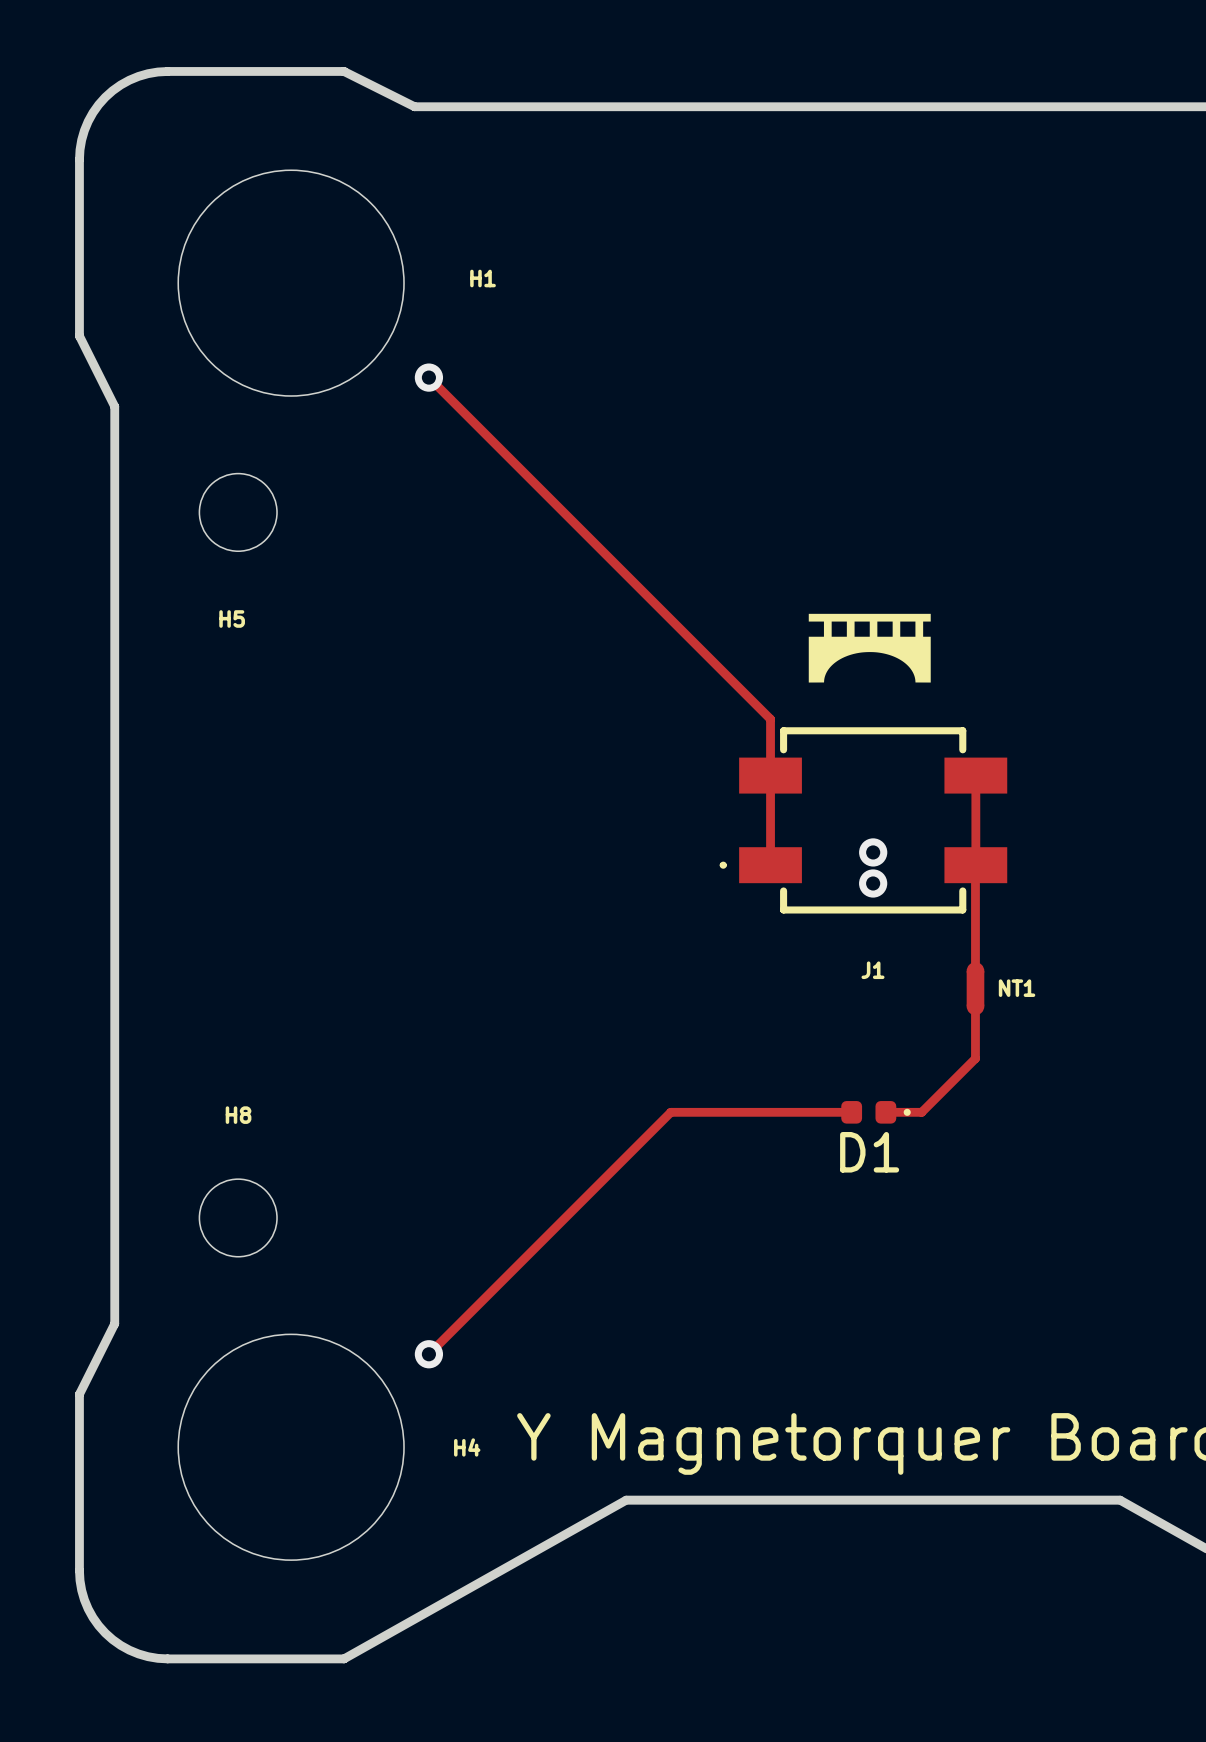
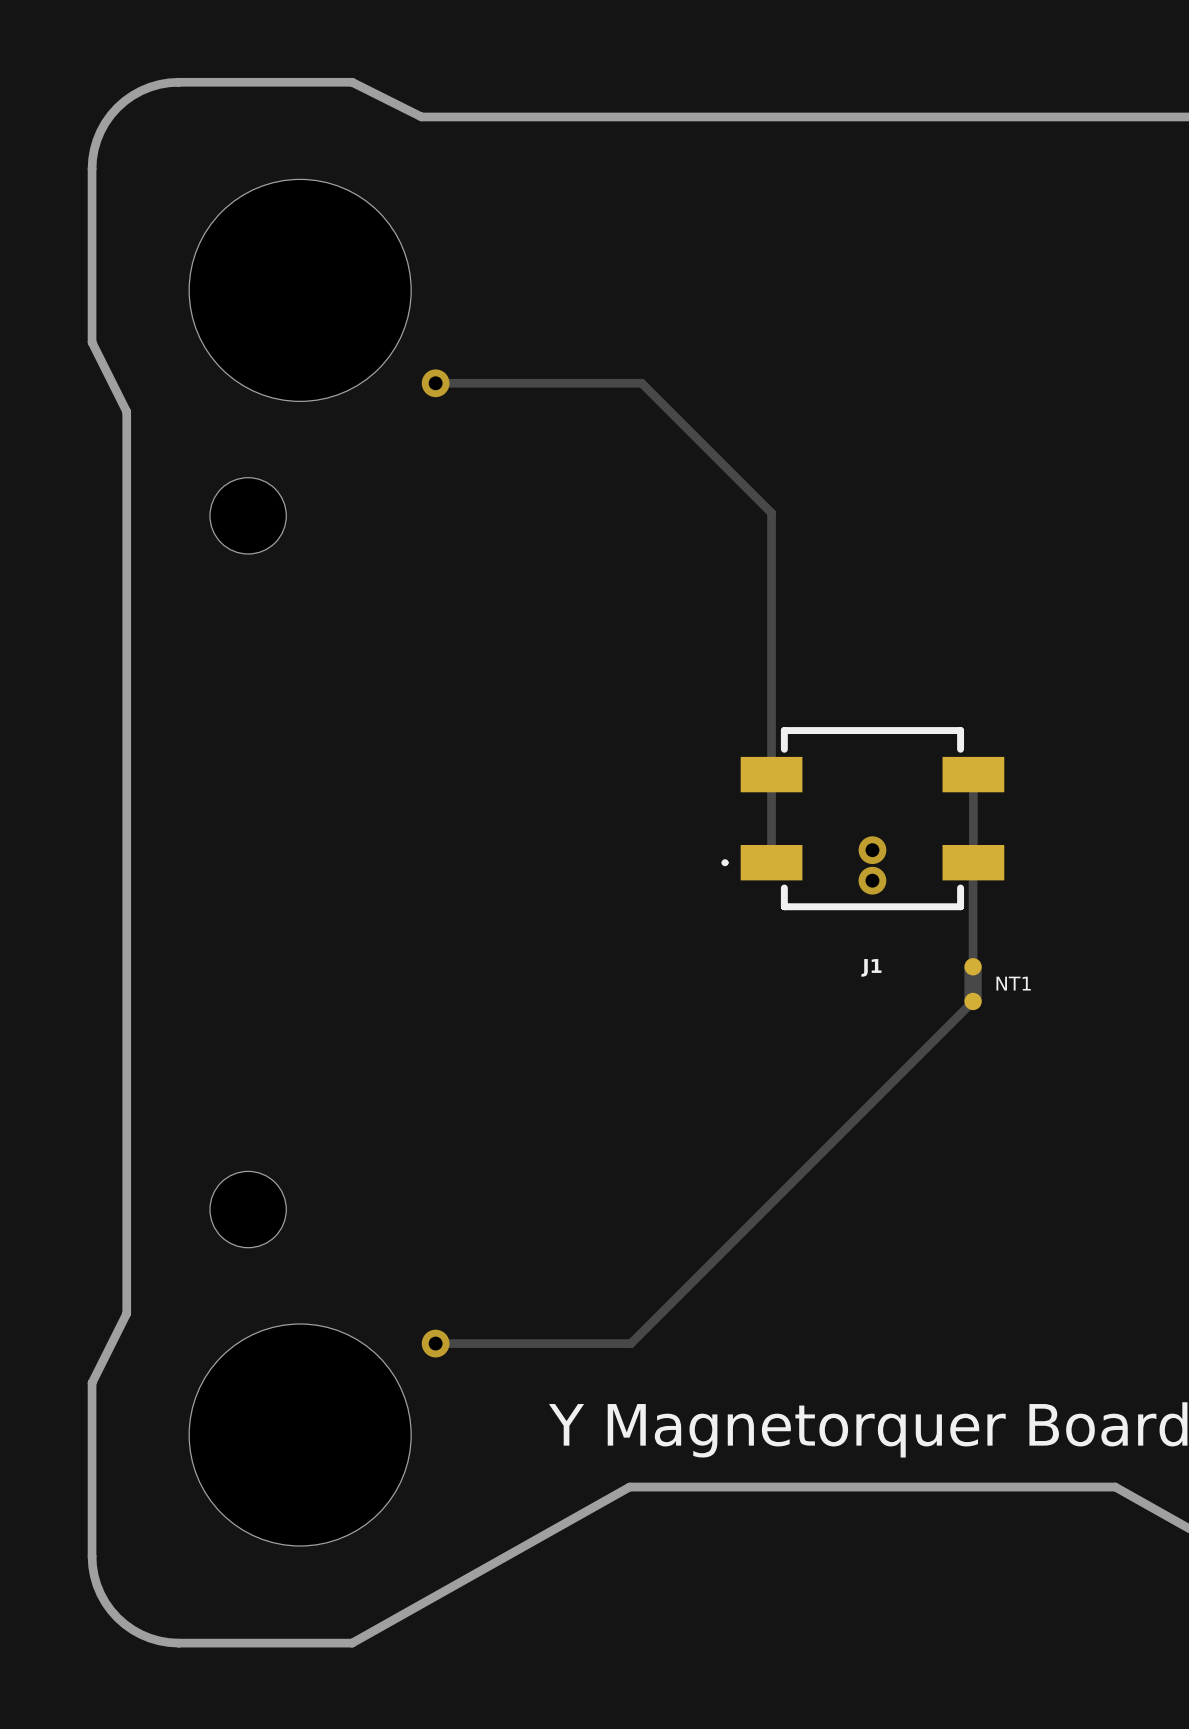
H1 name: H1 (483, 278) -> none
track: (428, 377) (770, 719) -> (435, 383) (641, 383) (771, 513) (771, 719)
drawing: [808, 613, 931, 683] -> none
H5 name: H5 (232, 618) -> none
track: (975, 1006) (975, 1058) (921, 1112) (885, 1112) -> none
track: (851, 1112) (670, 1112) (428, 1354) -> (973, 1001) (630, 1343) (435, 1343)
D1: (876, 1112) -> none
H8 name: H8 (238, 1115) -> none
H4 name: H4 (467, 1447) -> none

